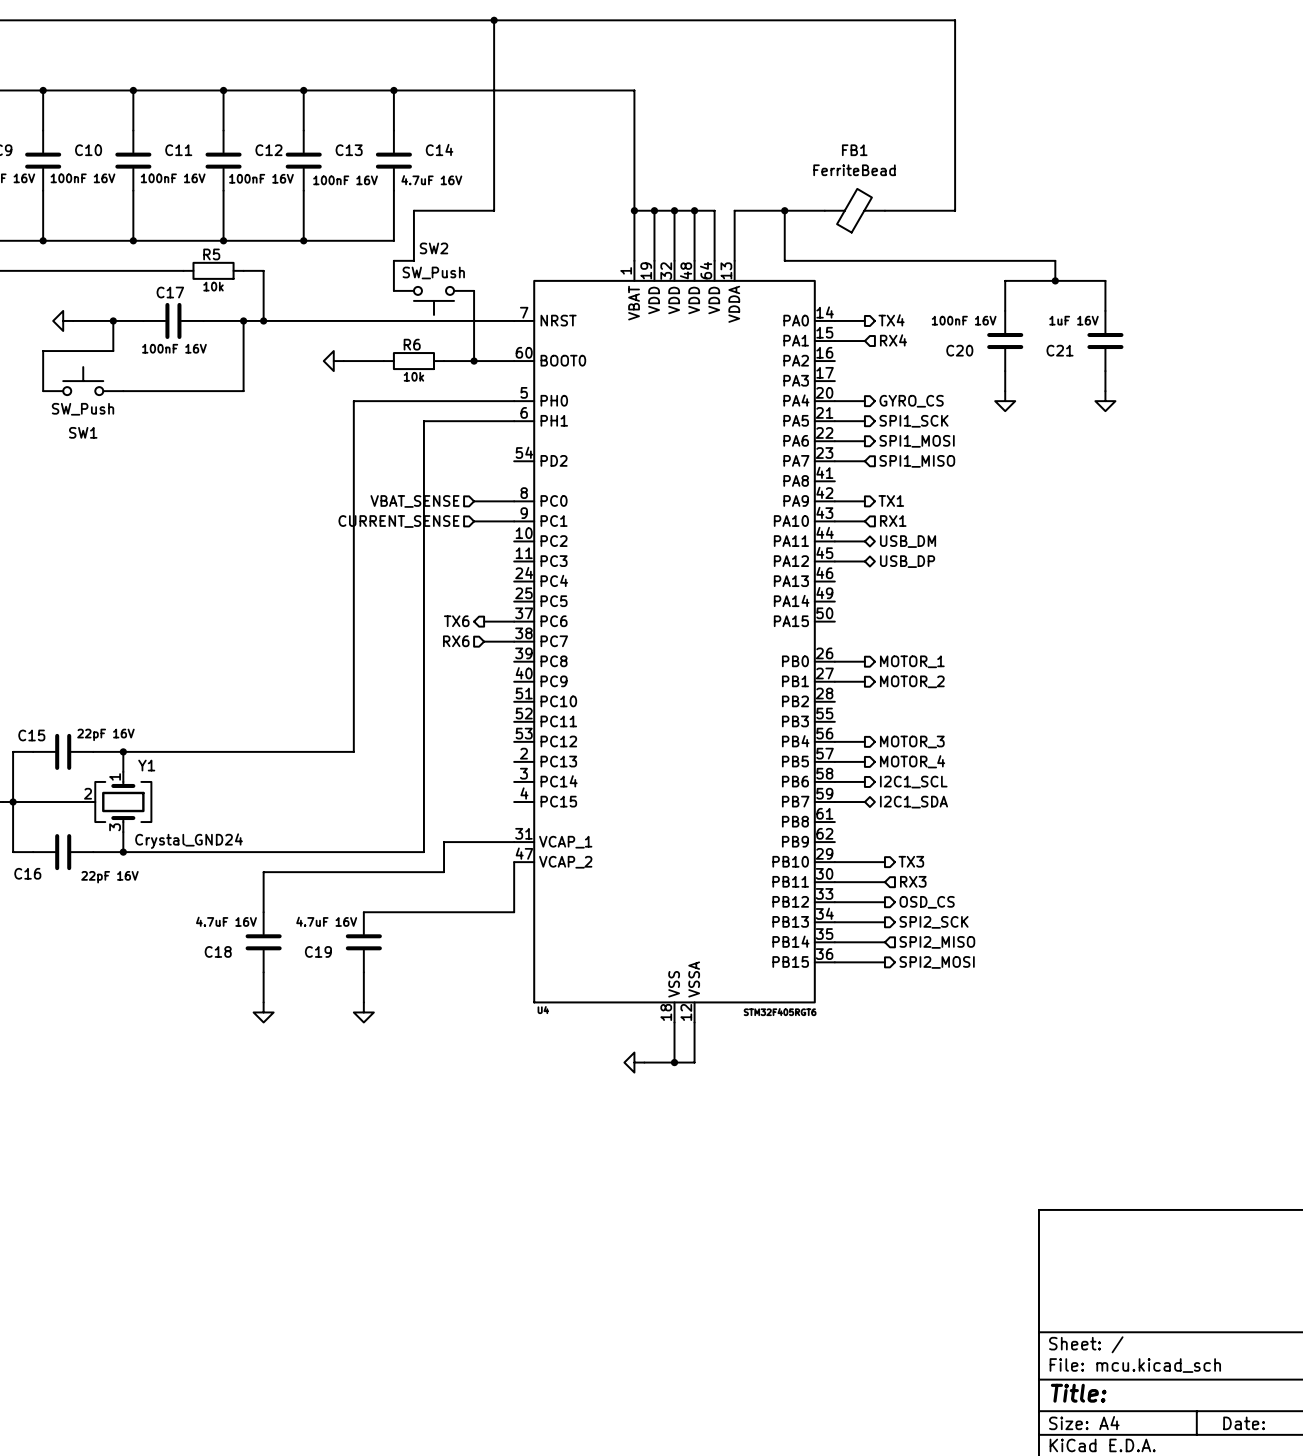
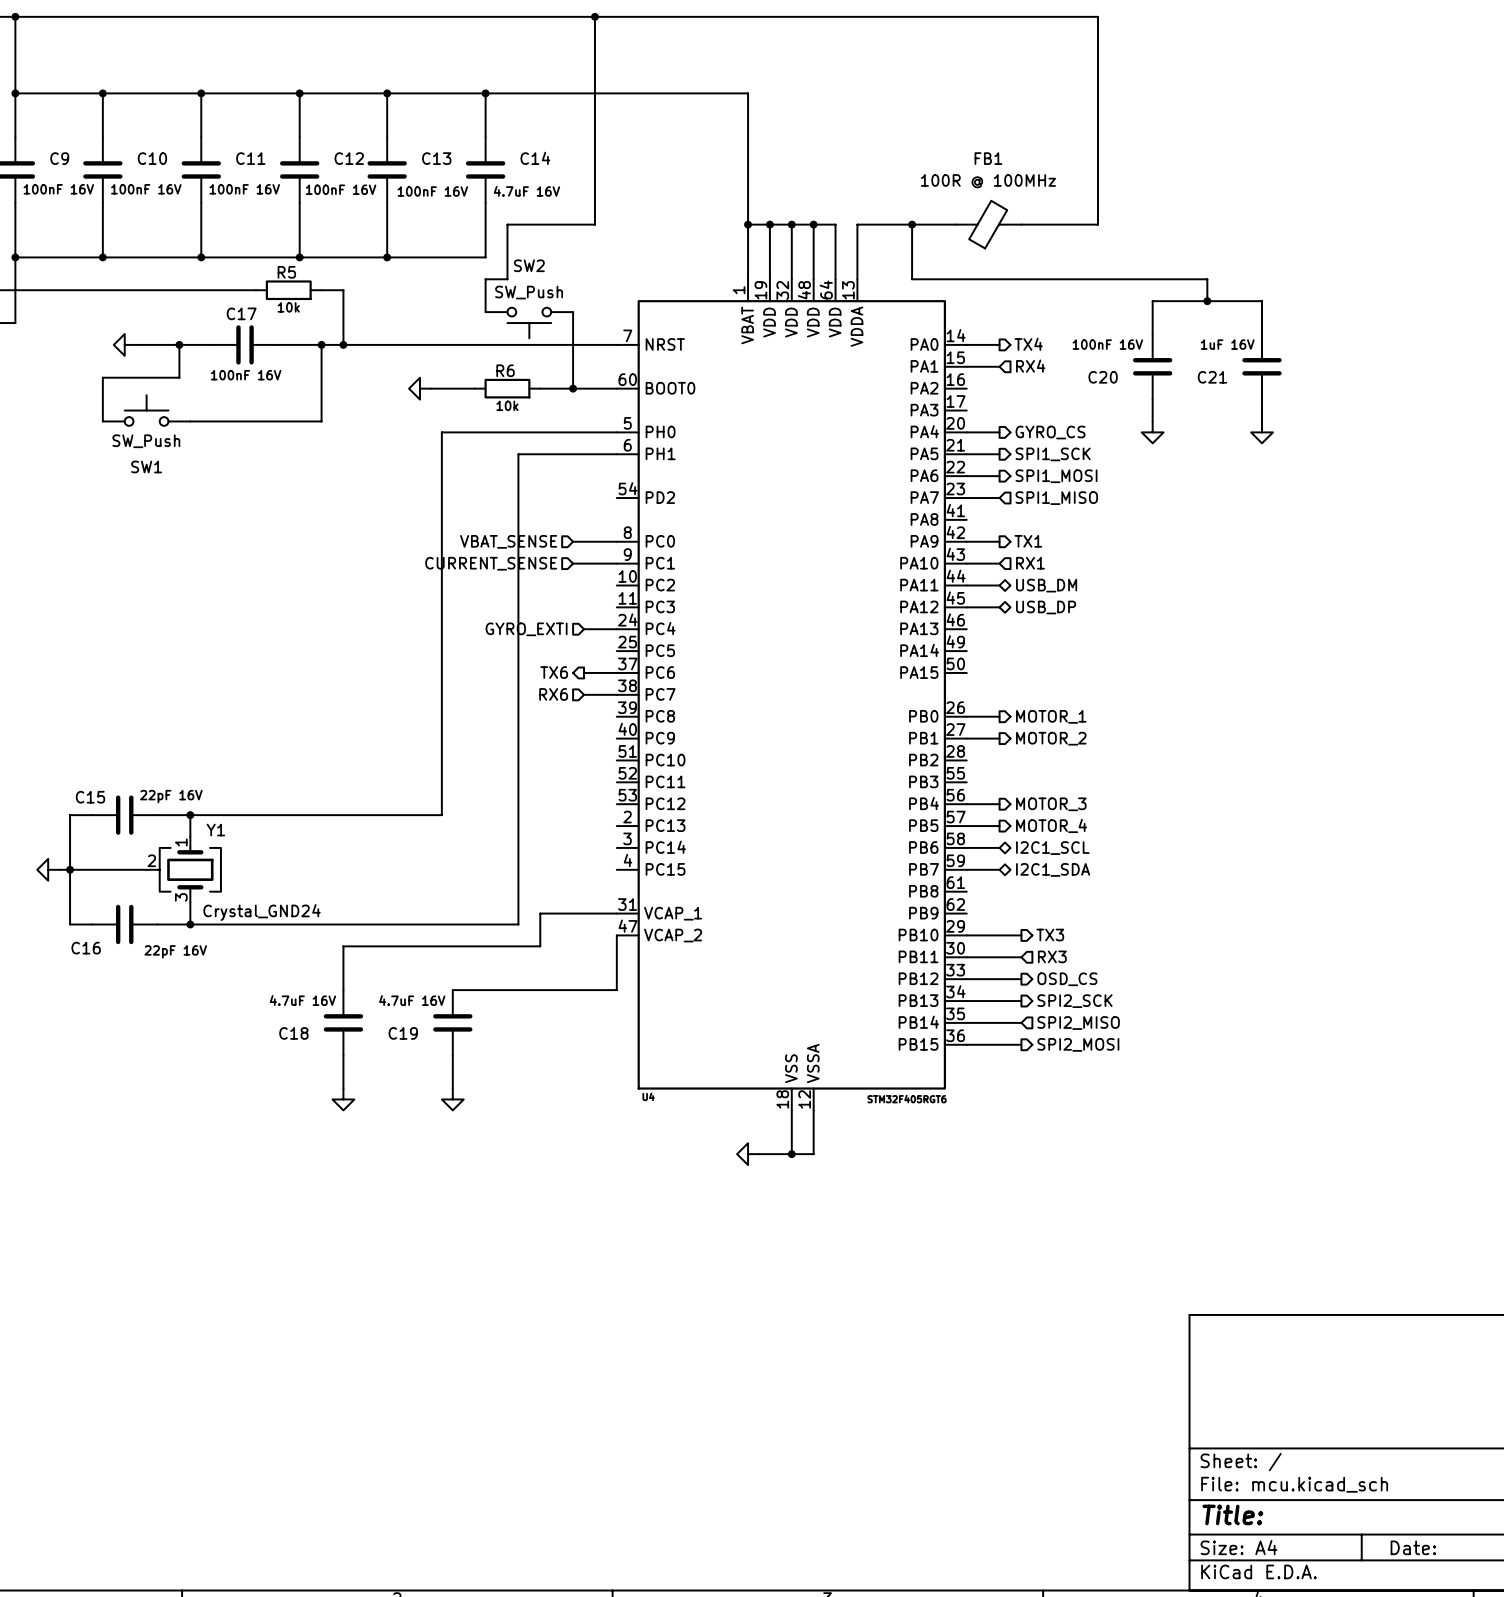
FB1 value: FerriteBead (854, 170) -> 100R @ 100MHz (988, 181)
hierarchical label: none -> GYRO_EXTI (526, 629)
wire: none -> (584, 629) (616, 629)
hierarchical label shape: output (913, 782) -> bidirectional (1052, 848)

